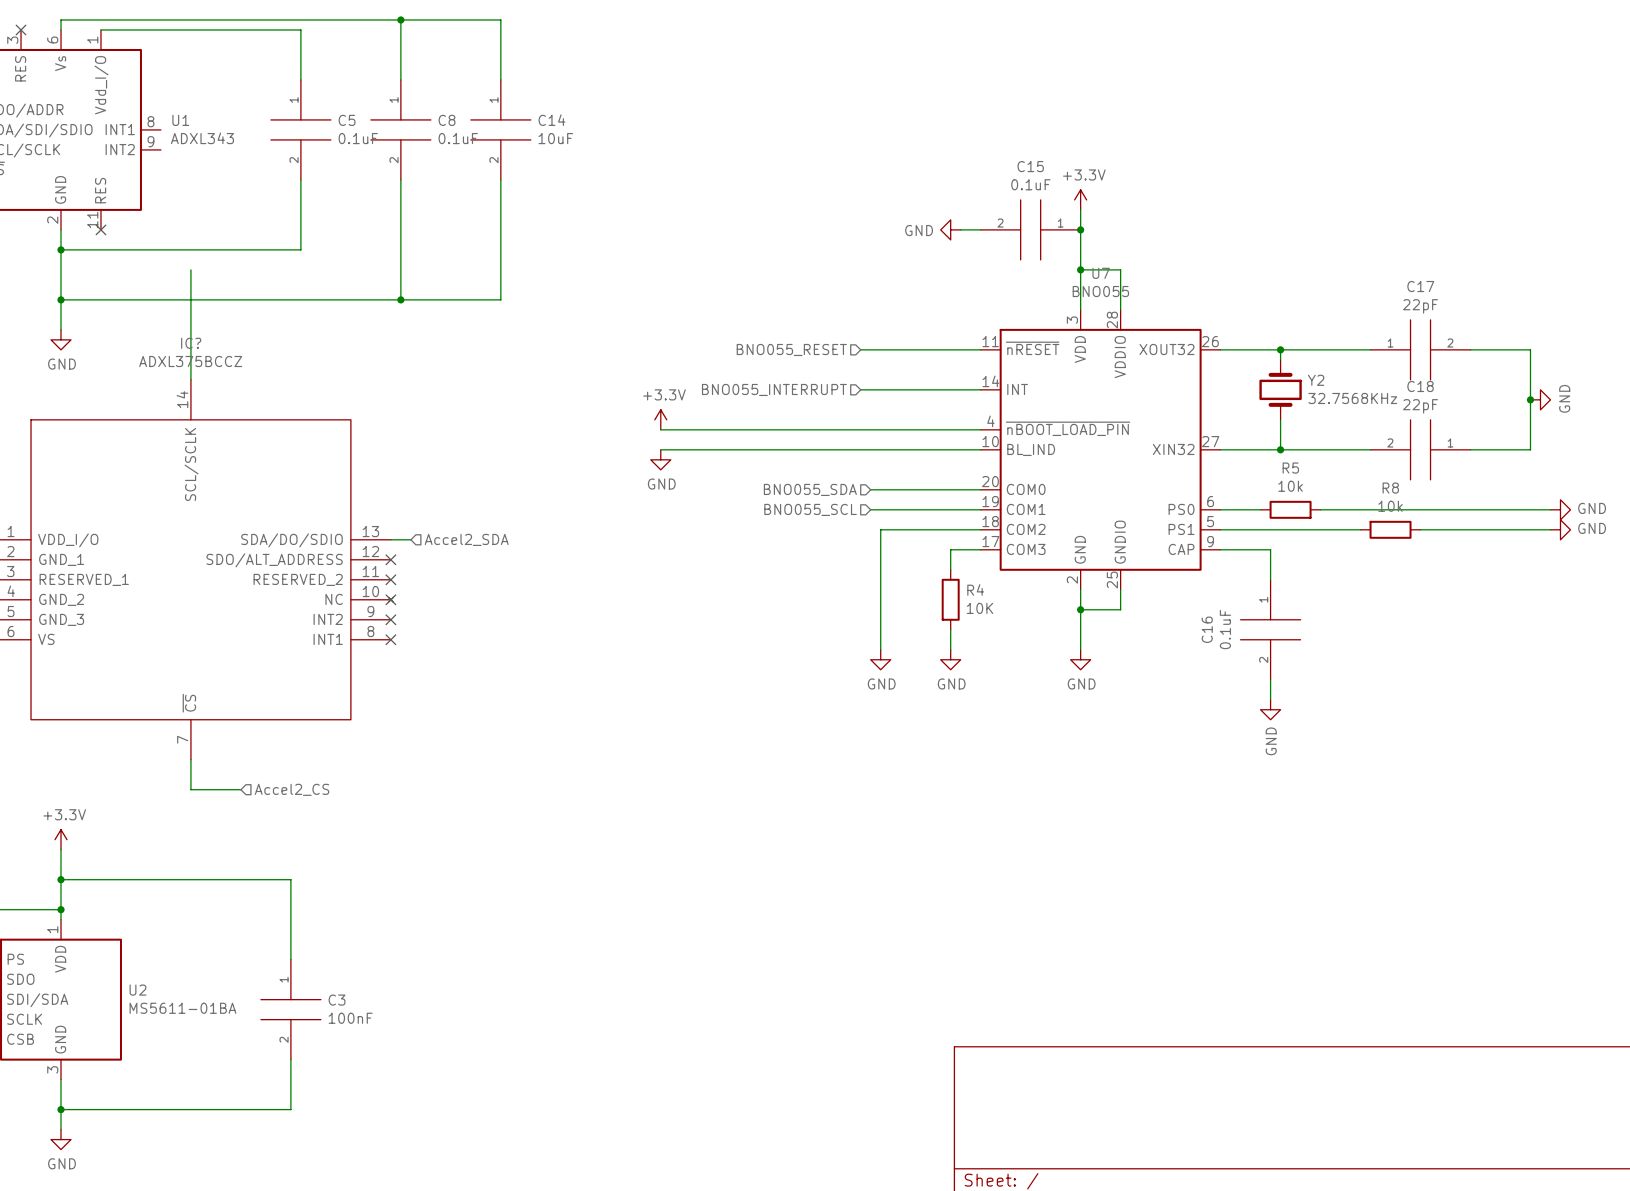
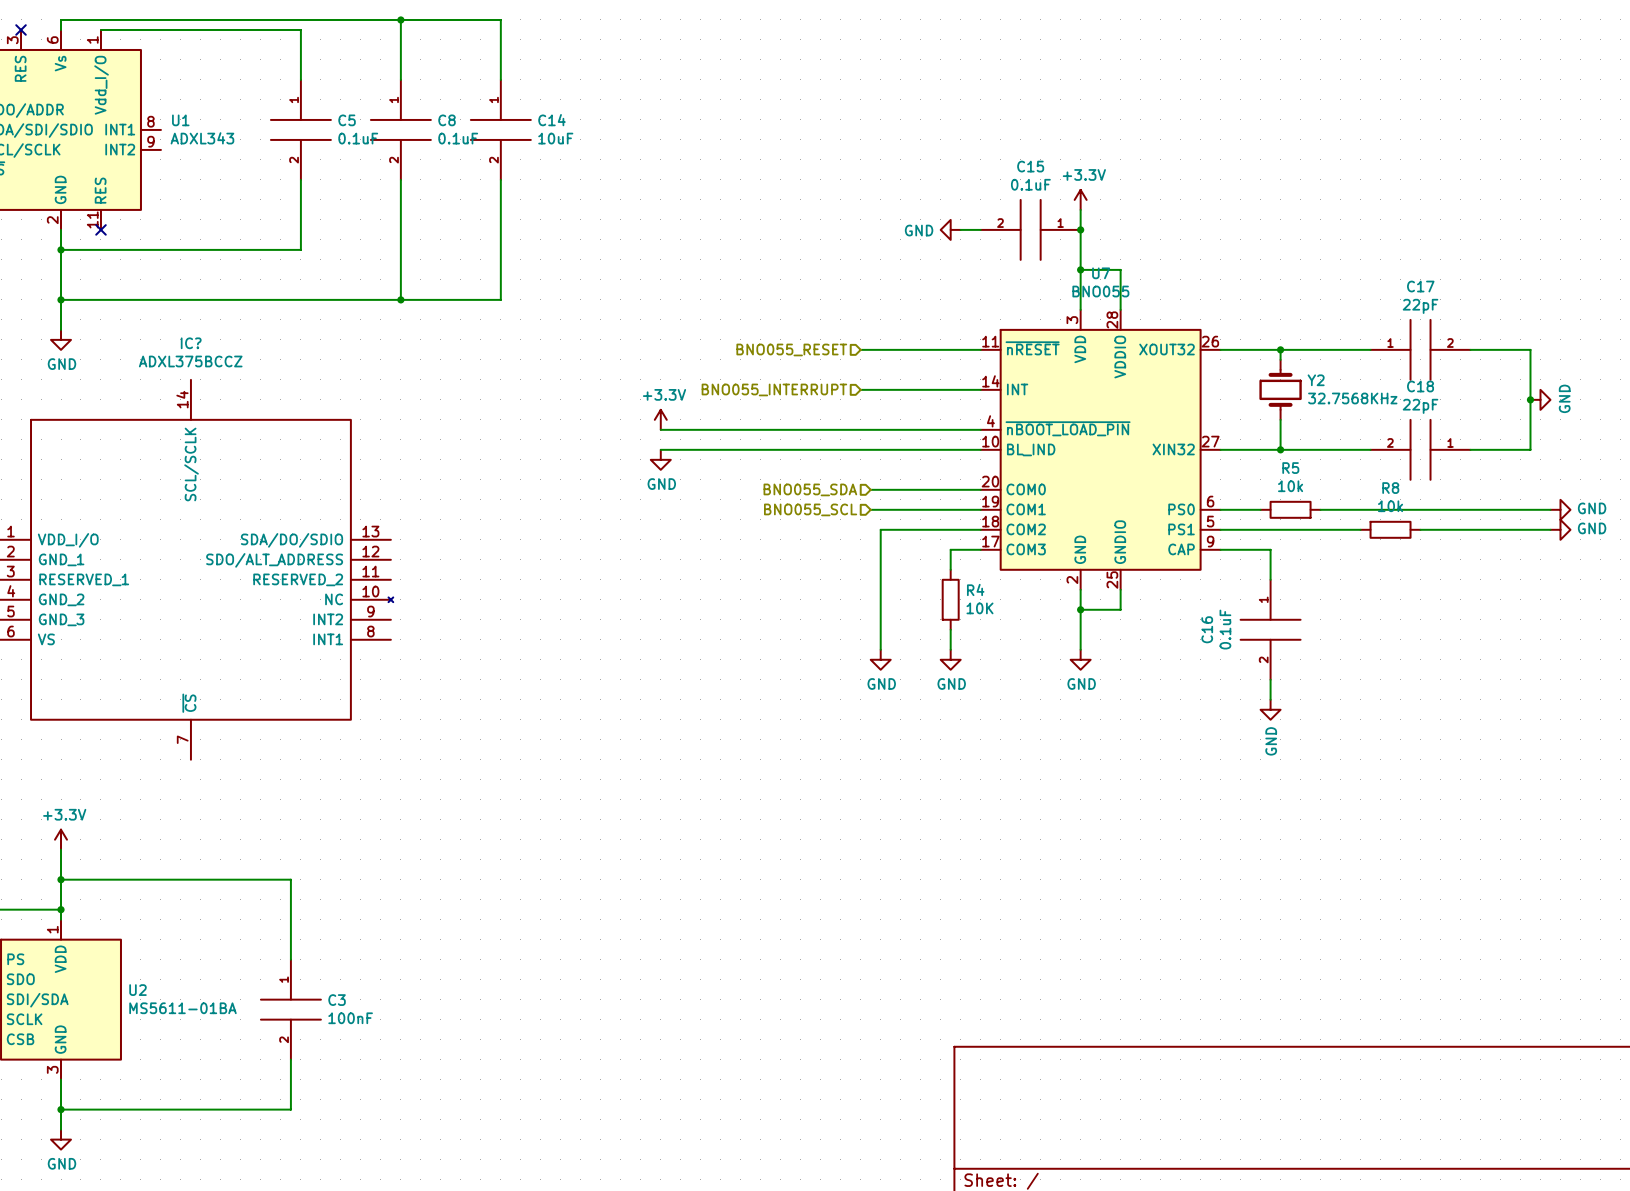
wire: (190, 269) (190, 379) -> none
wire: (390, 539) (410, 539) -> none
hierarchical label: Accel2_SDA (466, 539) -> none
no-connect mark: (390, 559) -> none
no-connect mark: (390, 579) -> none
no-connect mark: (390, 599) -> none
no-connect mark: (390, 619) -> none
no-connect mark: (390, 639) -> none
wire: (190, 759) (190, 789) (240, 789) -> none
hierarchical label: Accel2_CS (292, 789) -> none

